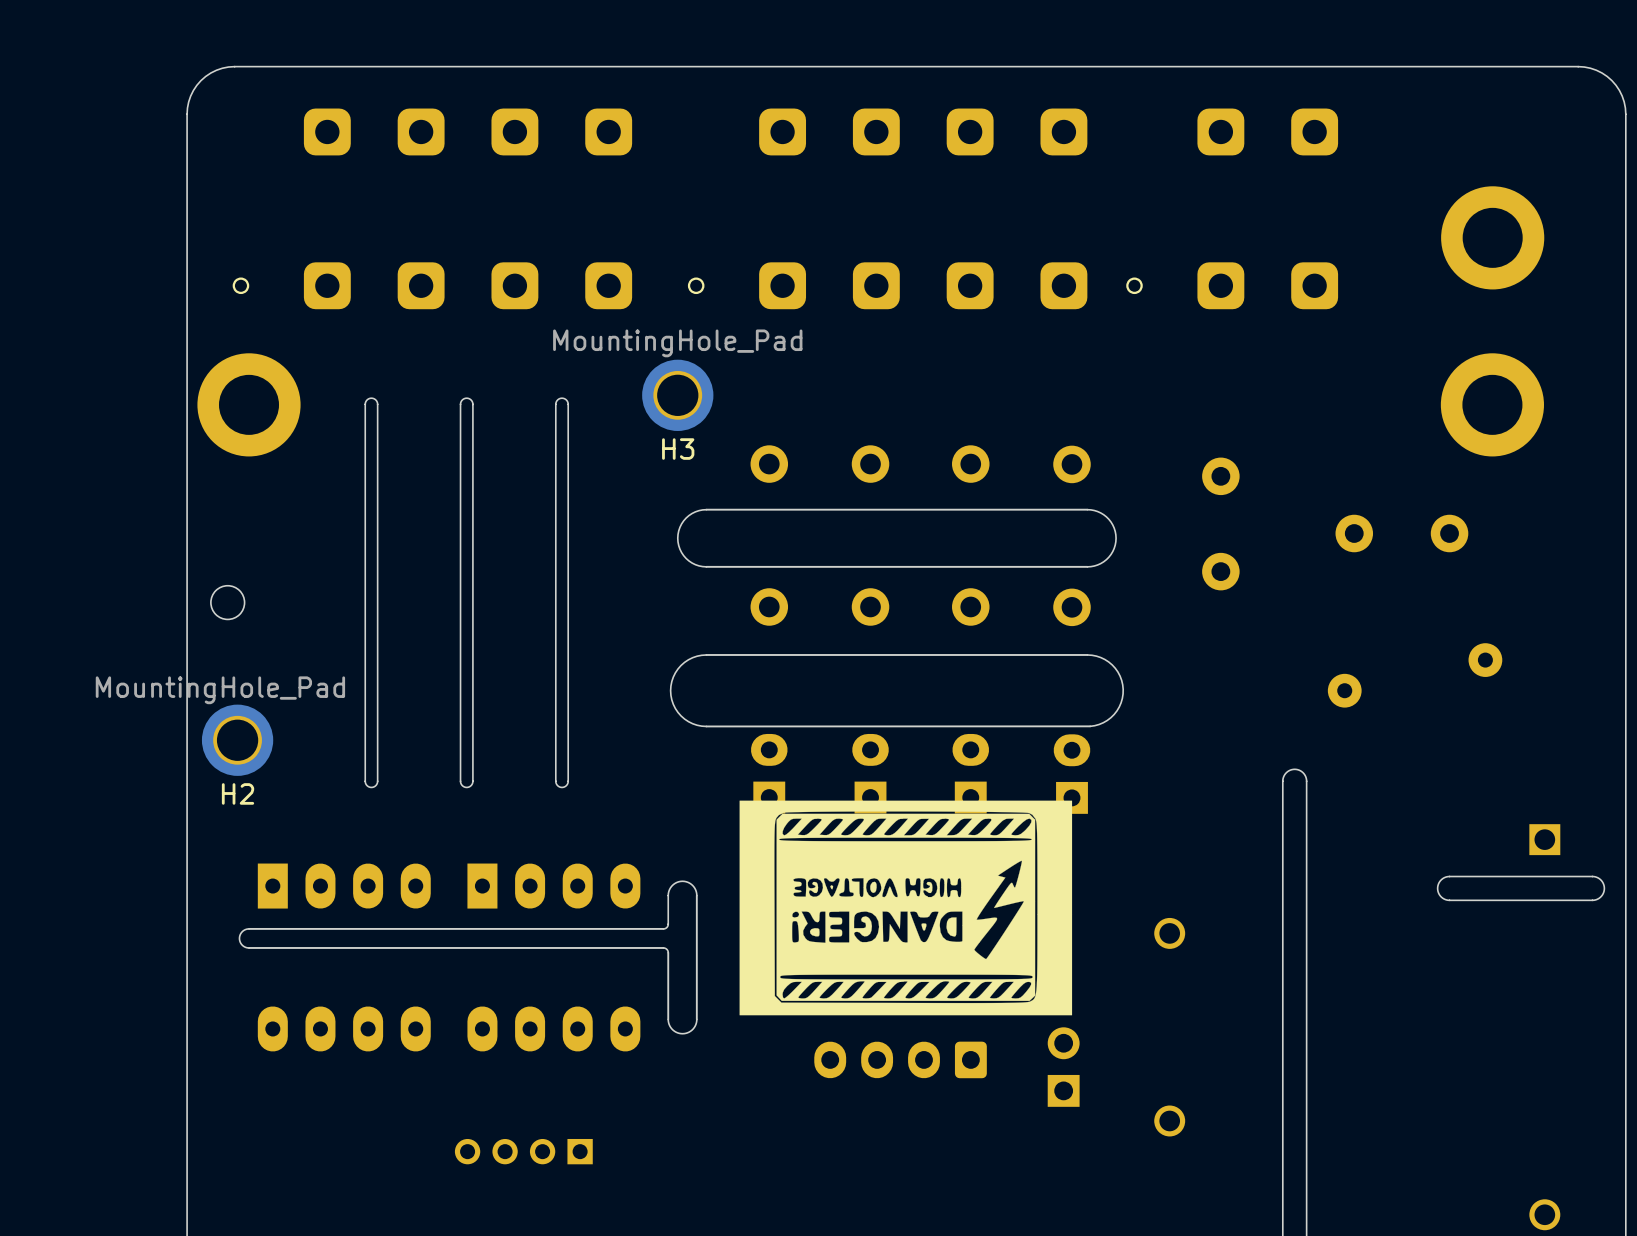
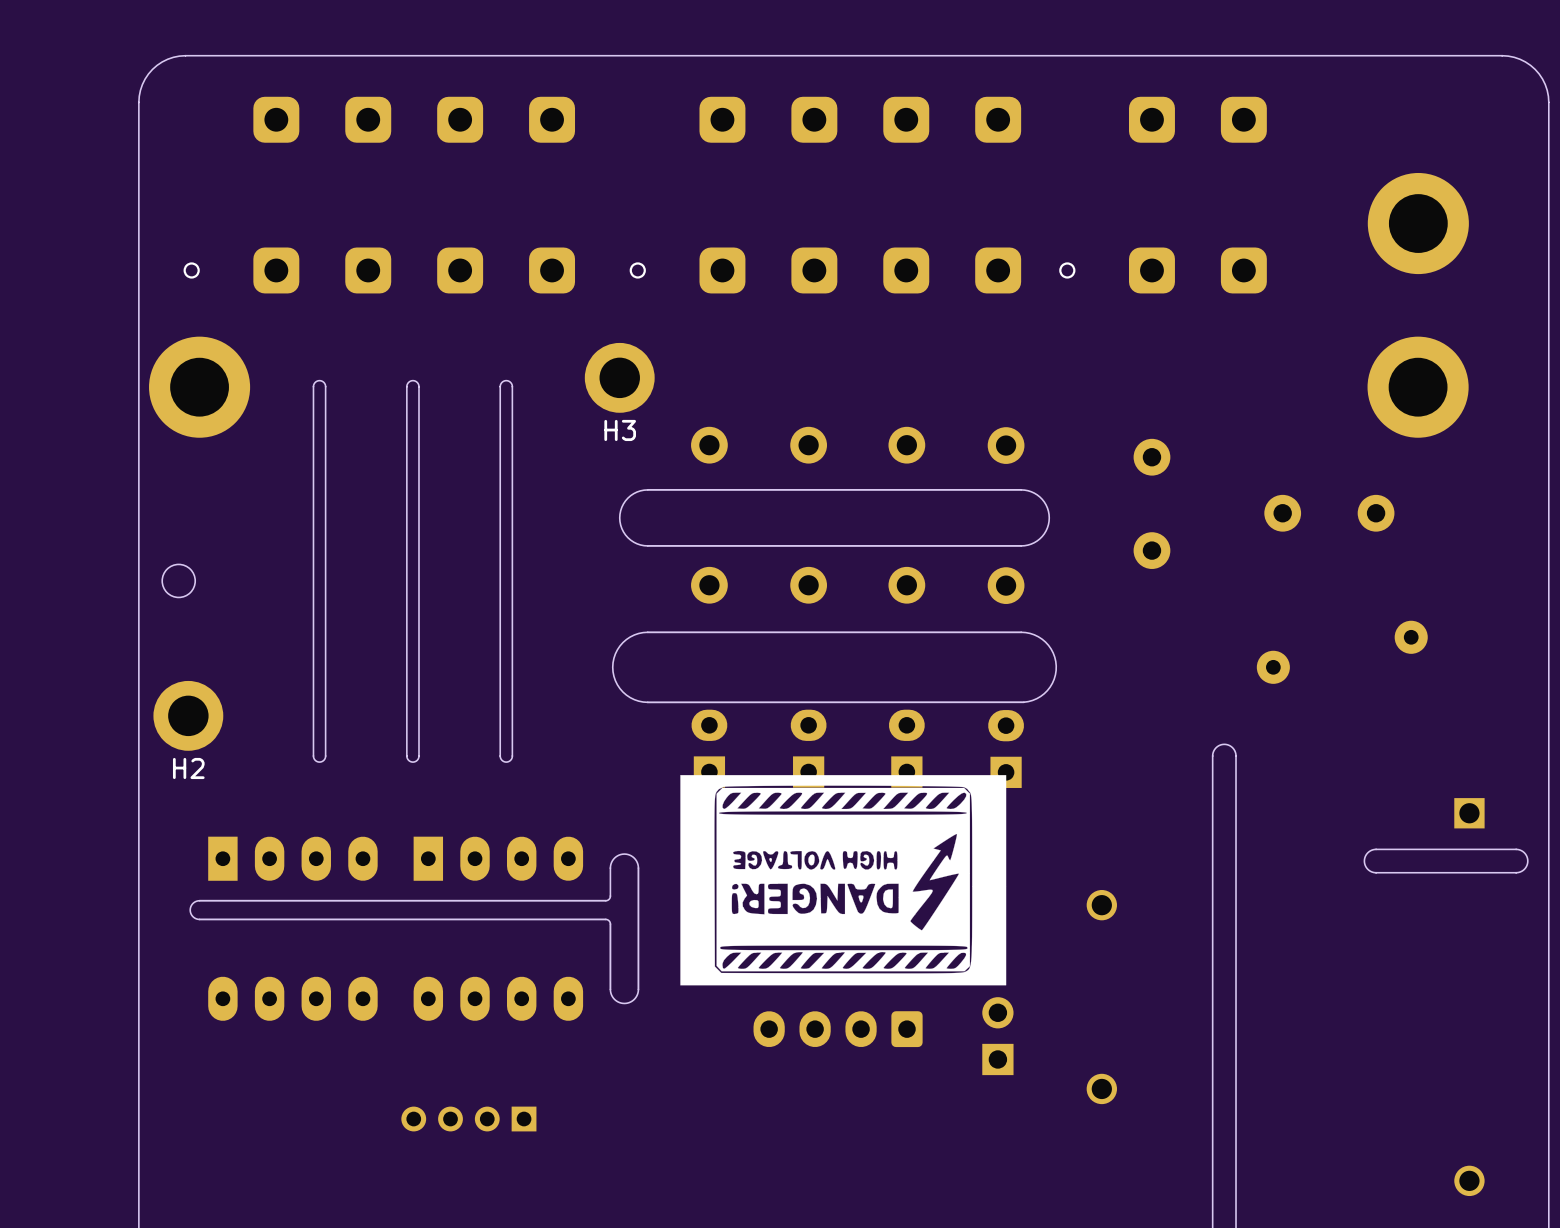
H3 value: MountingHole_Pad (677, 343) -> none
H2 value: MountingHole_Pad (220, 690) -> none

